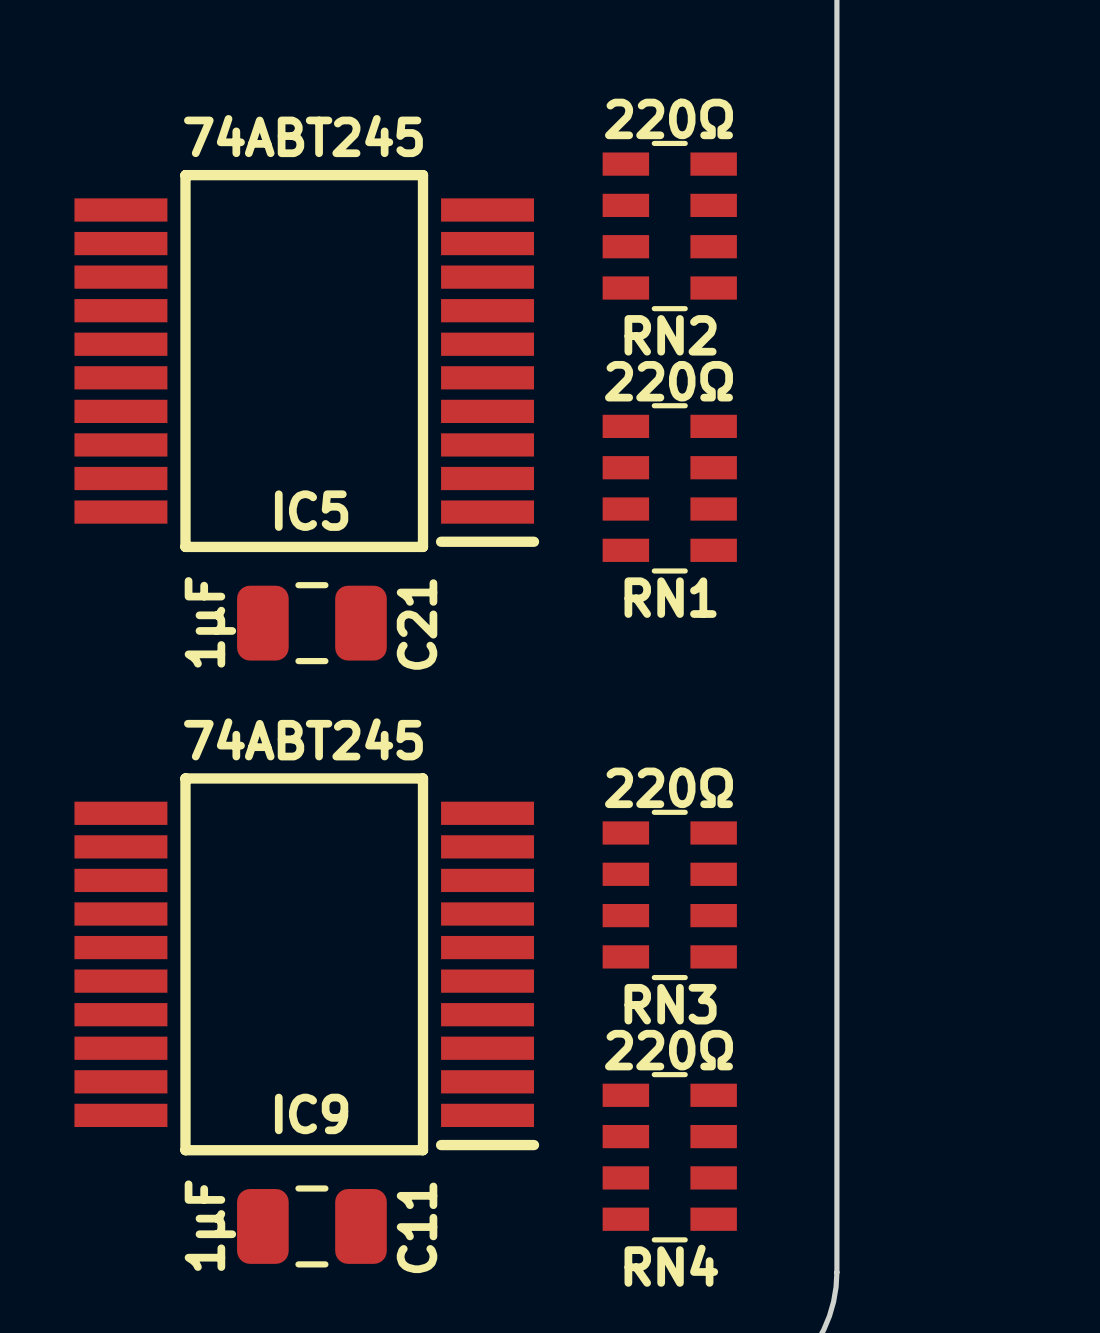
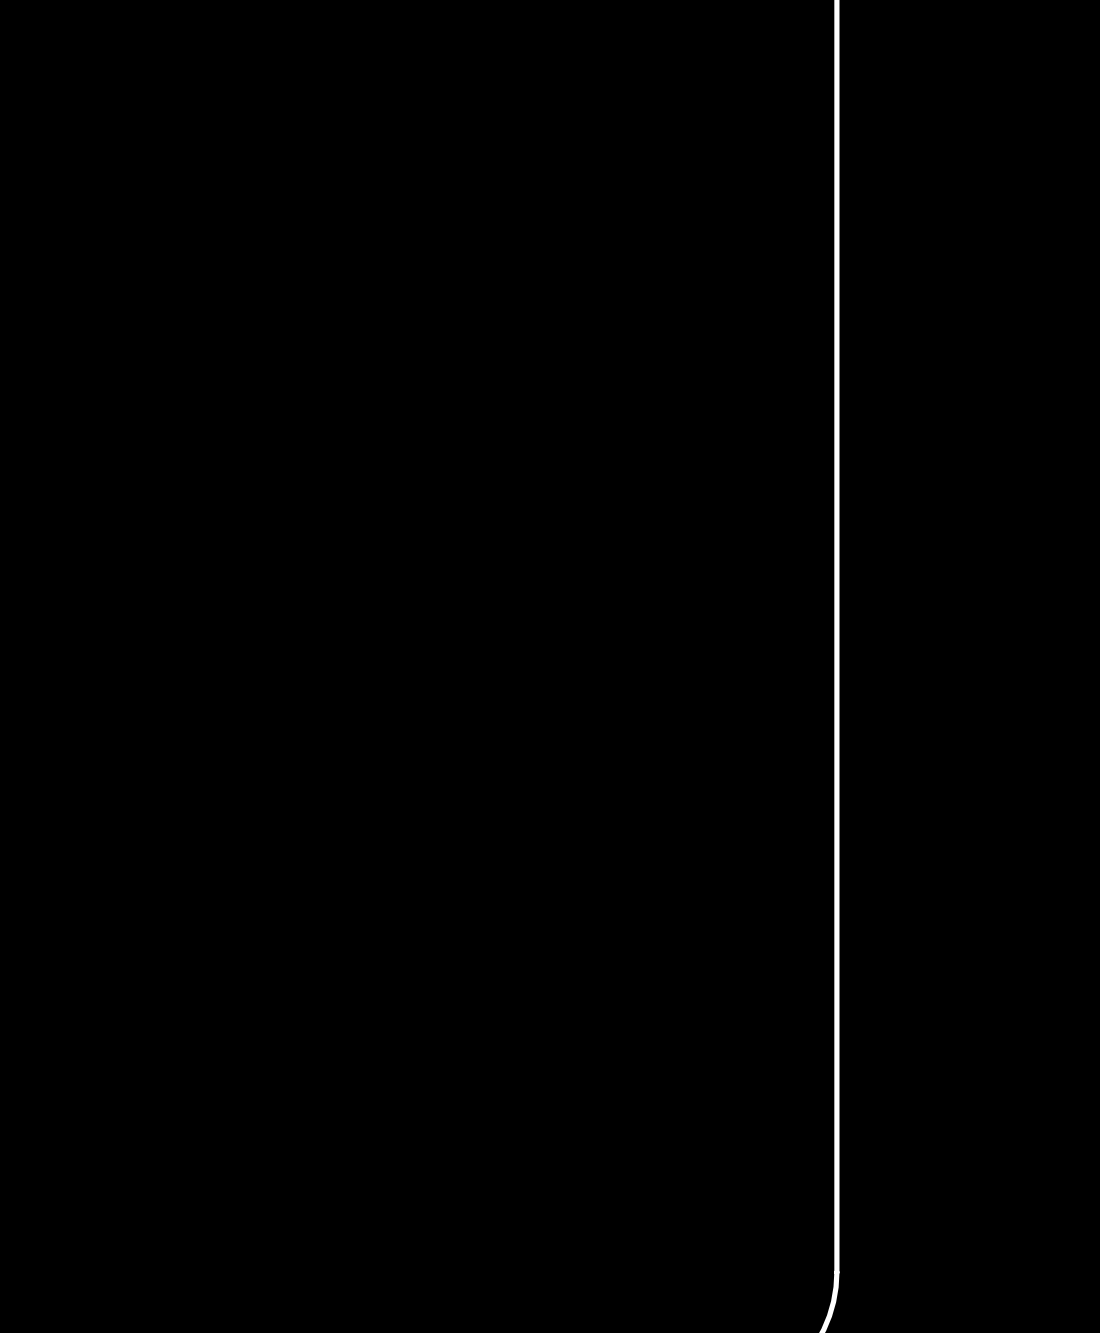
RN2: (669, 226) -> none
IC5: (306, 361) -> none
RN1: (669, 488) -> none
C21: 1μF (311, 623) -> none
RN3: (669, 894) -> none
IC9: (306, 964) -> none
RN4: (669, 1157) -> none
C11: 1μF (311, 1226) -> none

